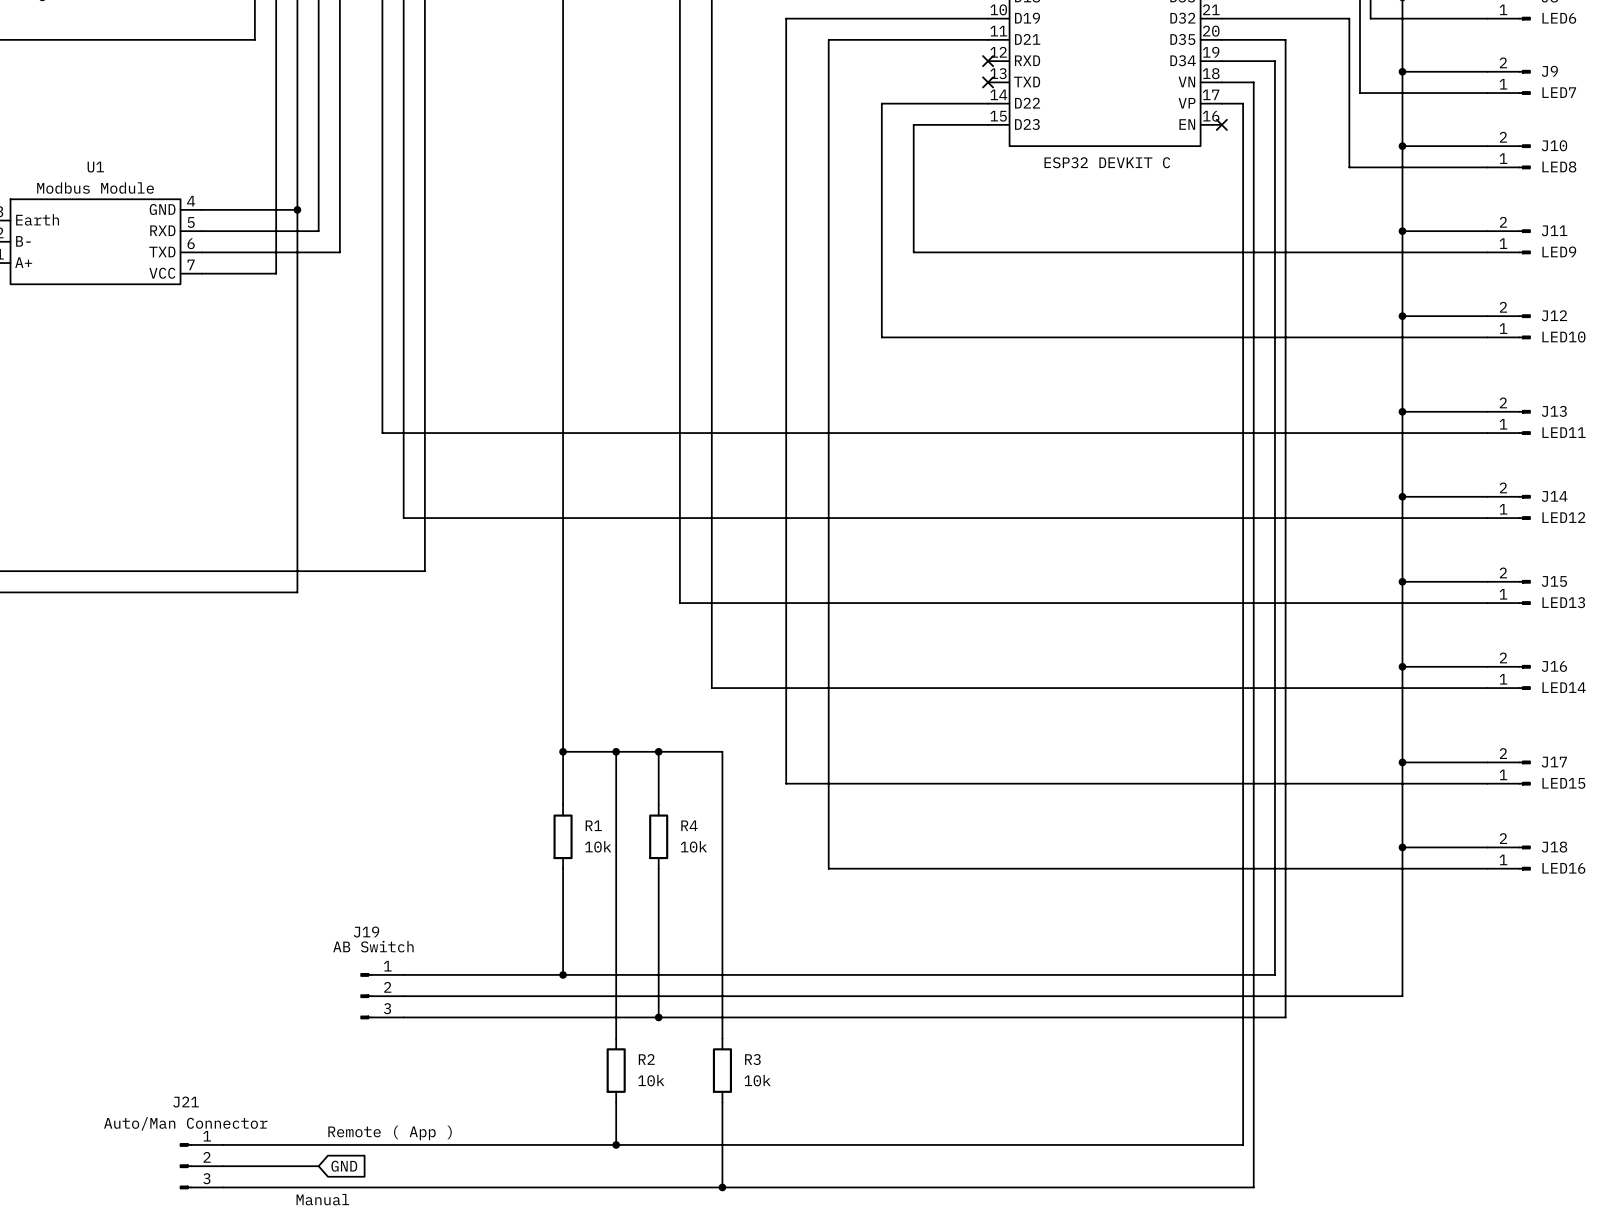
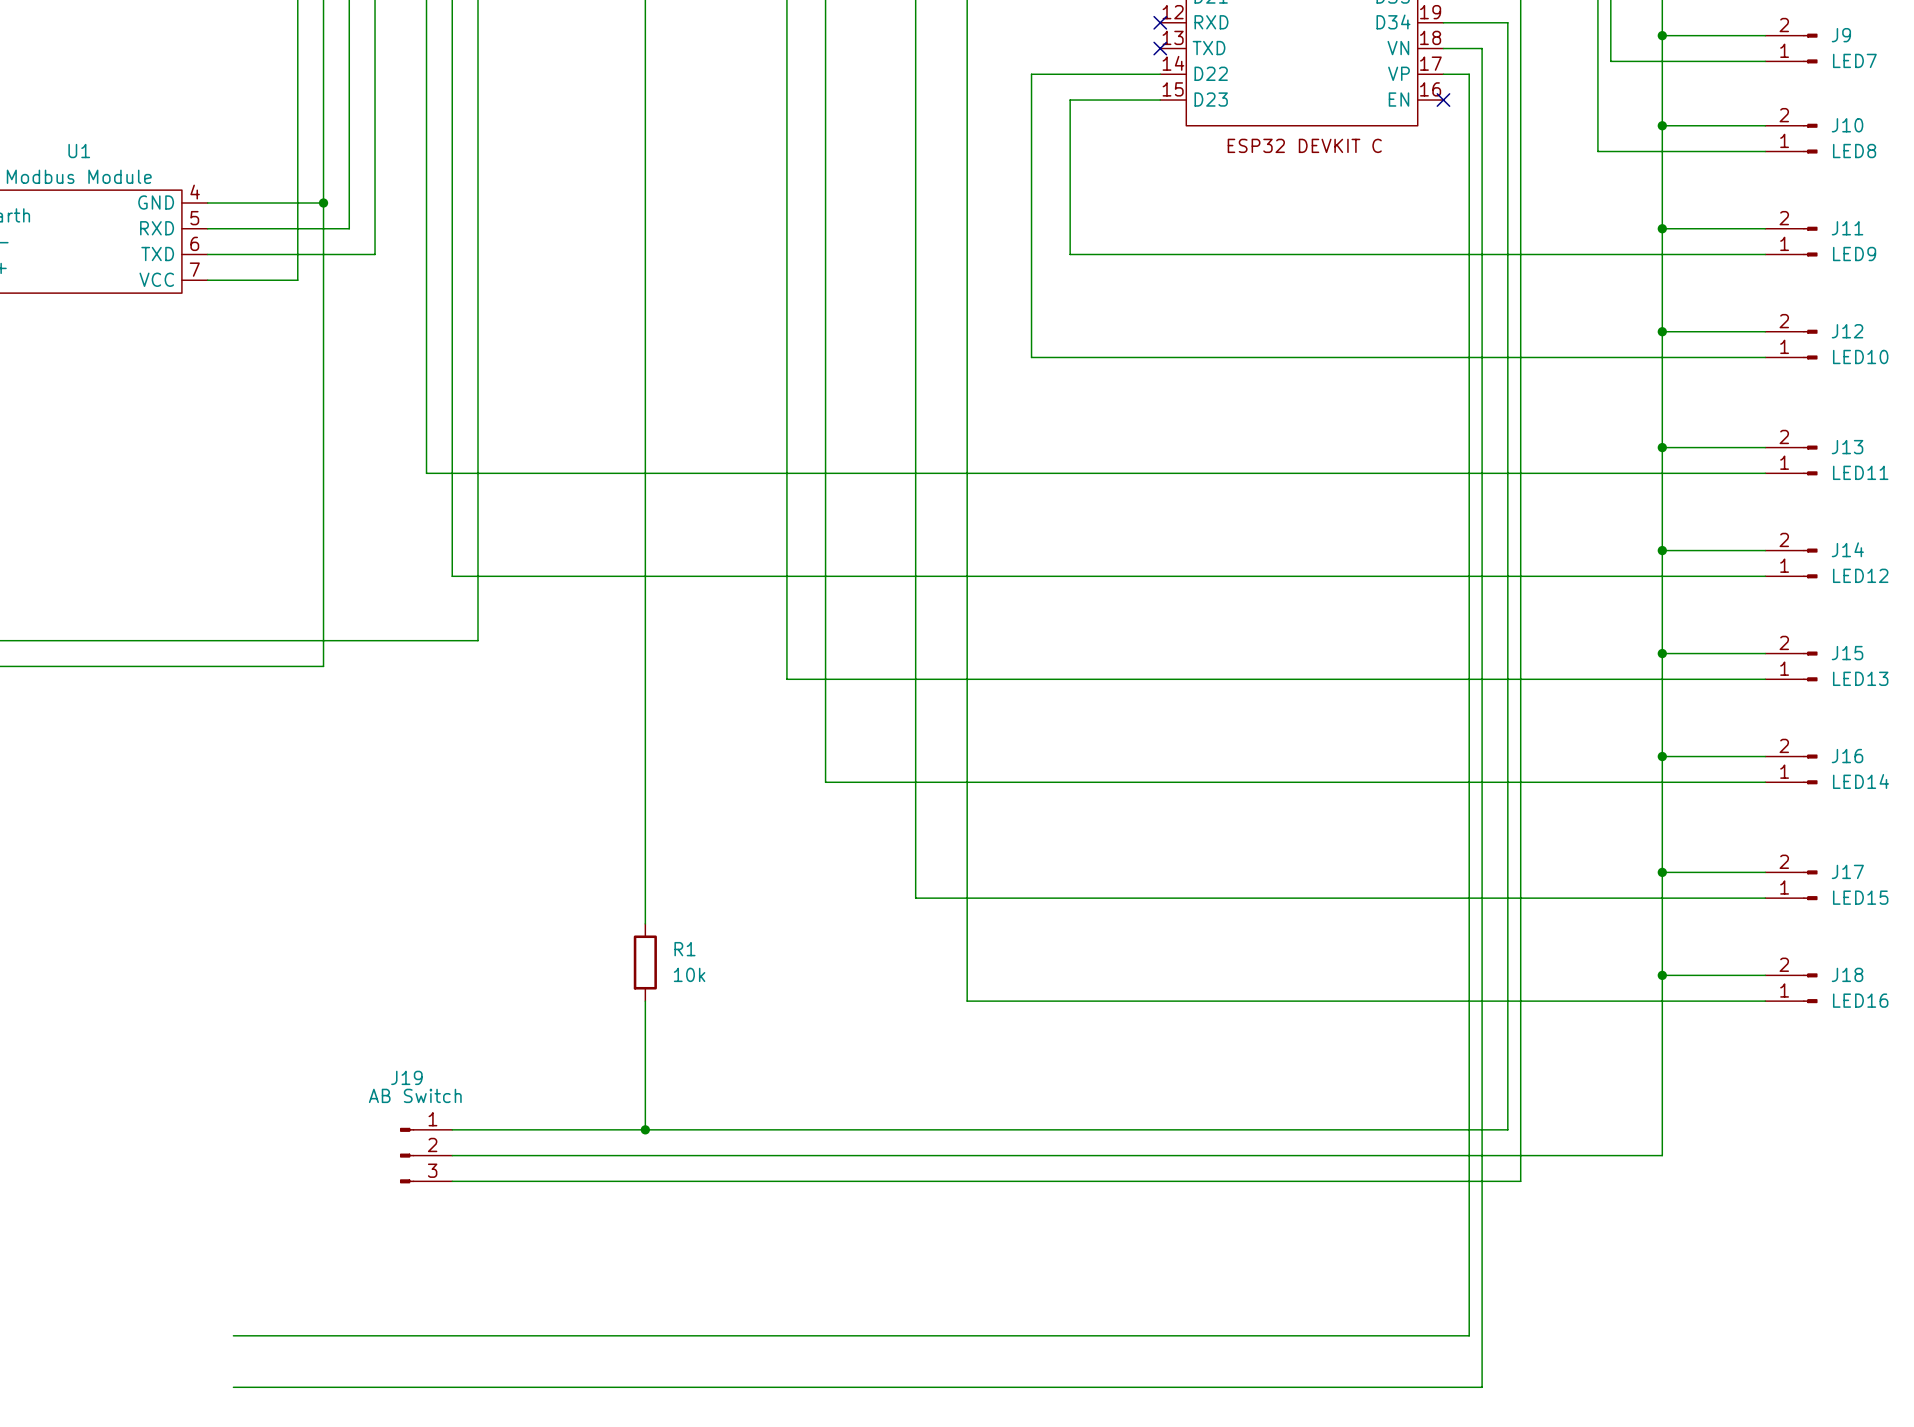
wire: (563, 751) (722, 751) (722, 1038) -> none
junction: (563, 751) -> none
wire: (616, 751) (616, 1038) -> none
junction: (616, 751) -> none
wire: (658, 751) (658, 804) -> none
junction: (658, 751) -> none
R4: 10k (658, 836) -> none
wire: (658, 868) (658, 1017) -> none
junction: (658, 1017) -> none
R2: 10k (616, 1070) -> none
R3: 10k (722, 1070) -> none
wire: (616, 1102) (616, 1144) -> none
wire: (722, 1102) (722, 1187) -> none
text: Remote ( App ) (390, 1132) -> none
junction: (616, 1144) -> none
J21: Auto/Man Connector (201, 1166) -> none
wire: (223, 1166) (318, 1166) -> none
global label: GND (344, 1166) -> none
junction: (722, 1187) -> none
text: Manual (322, 1199) -> none

